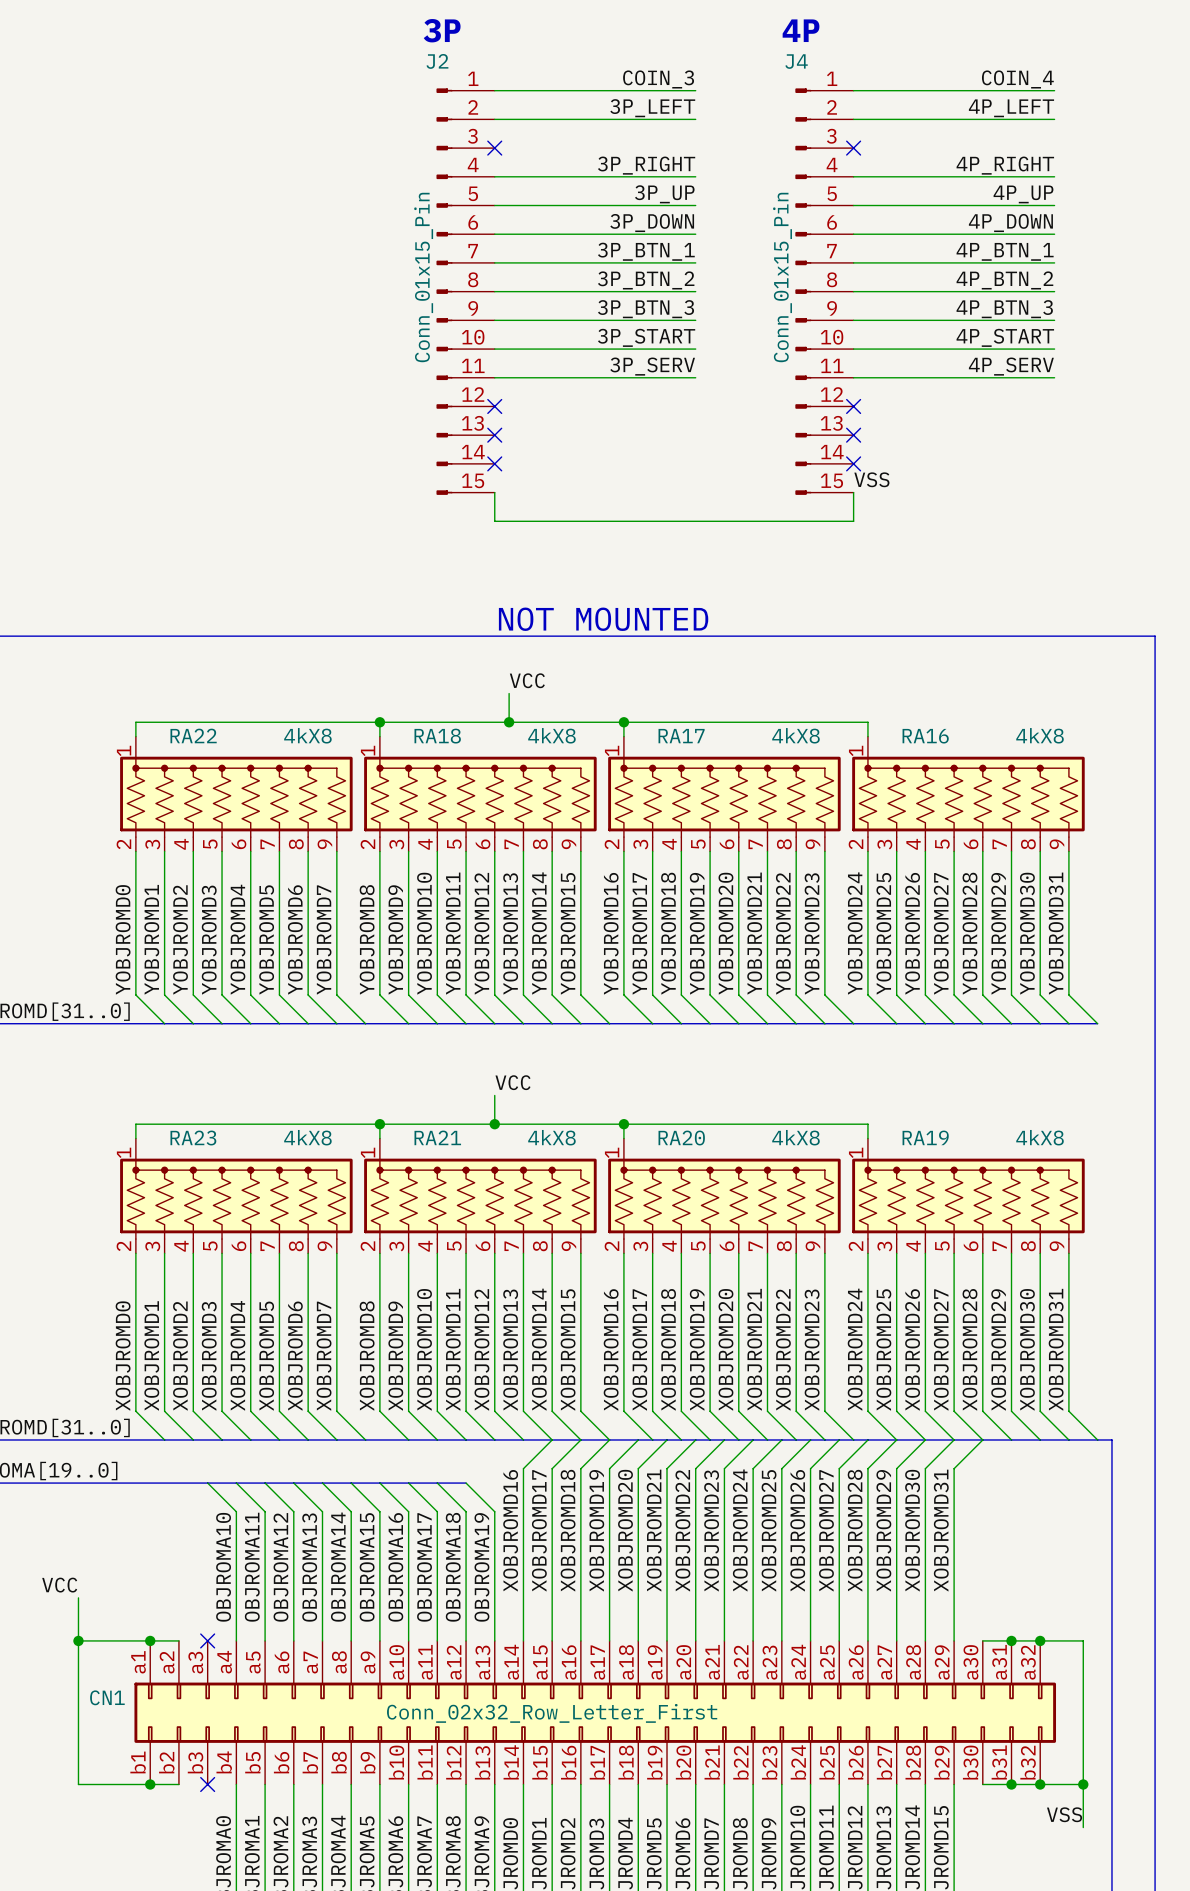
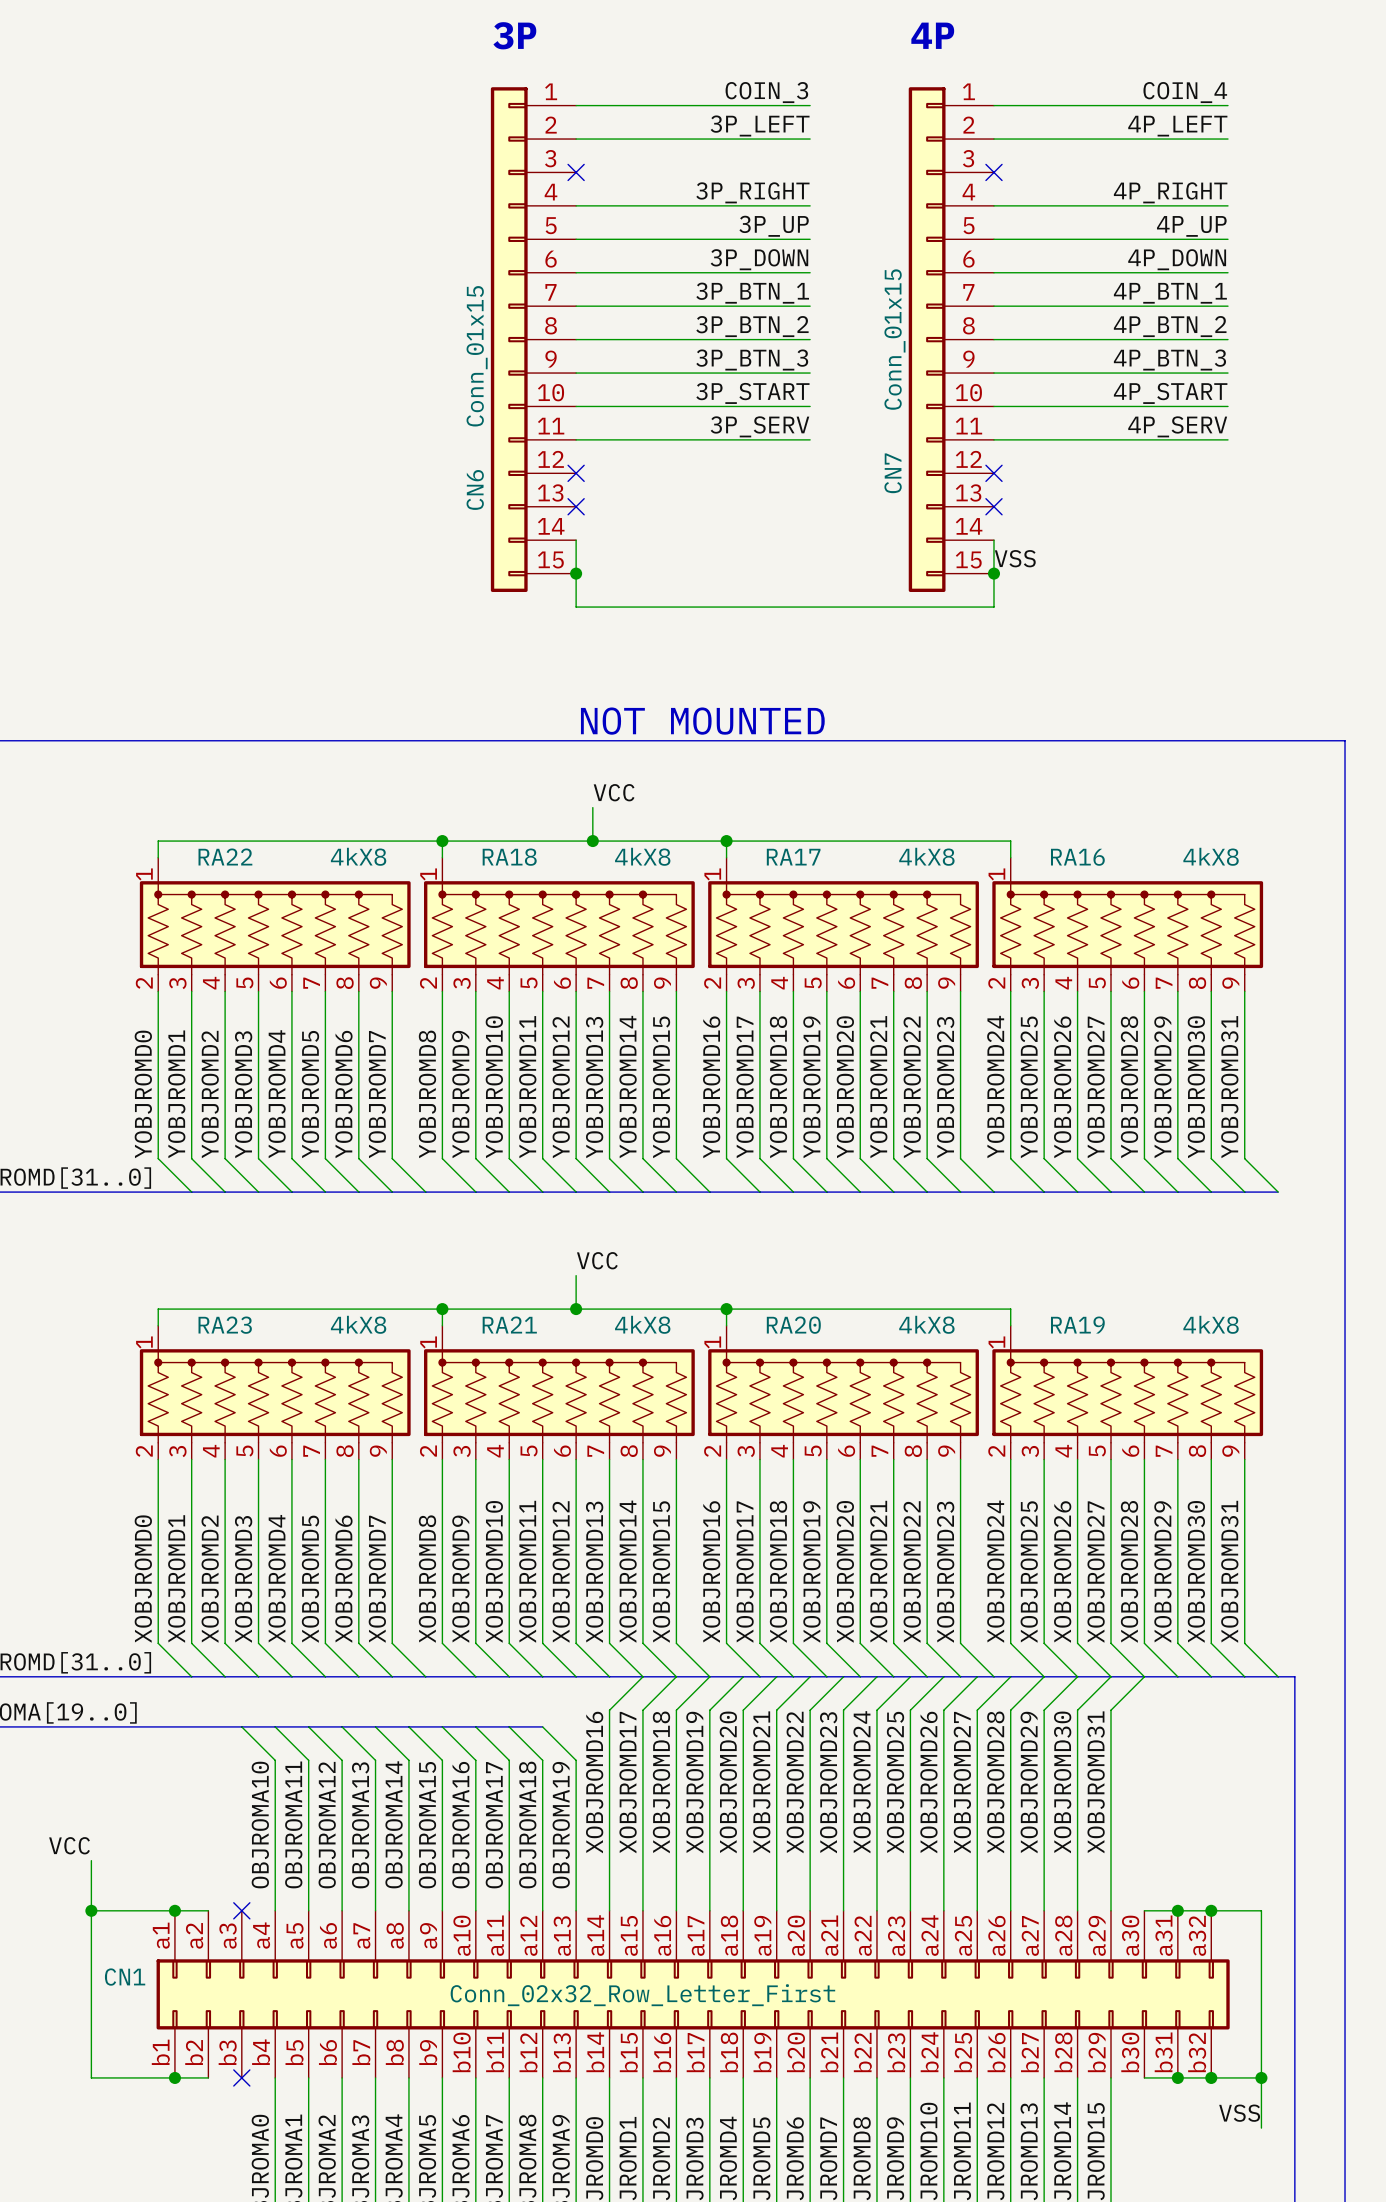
CN6: none -> Conn_01x15 (533, 339)
J2: Conn_01x15_Pin (465, 291) -> none
CN7: none -> Conn_01x15 (951, 339)
J4: Conn_01x15_Pin (824, 291) -> none
wire: none -> (576, 540) (576, 573)
no-connect mark: (494, 463) -> none
wire: none -> (993, 540) (993, 573)
no-connect mark: (853, 463) -> none
junction: none -> (576, 573)
junction: none -> (993, 573)

